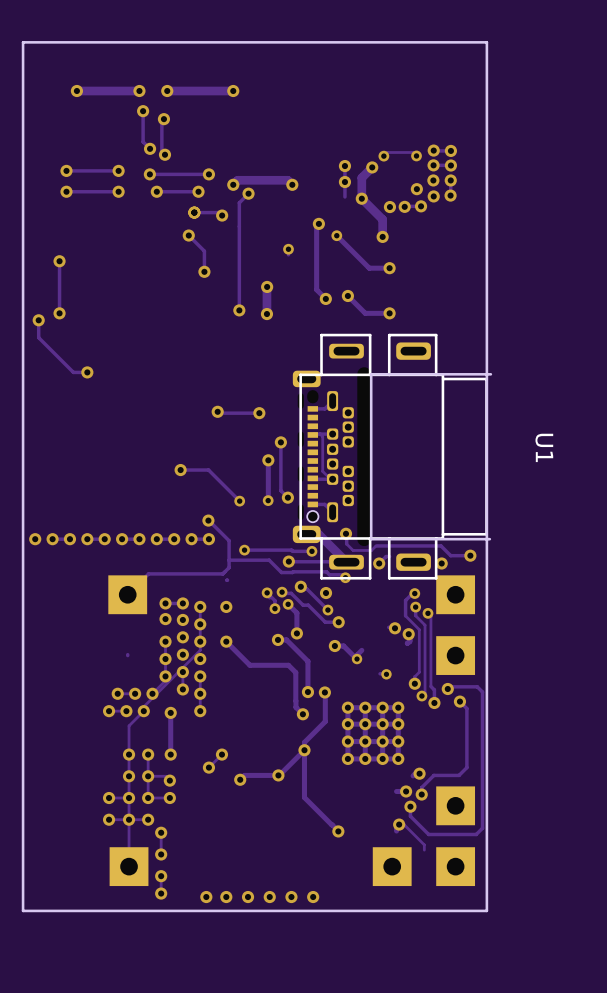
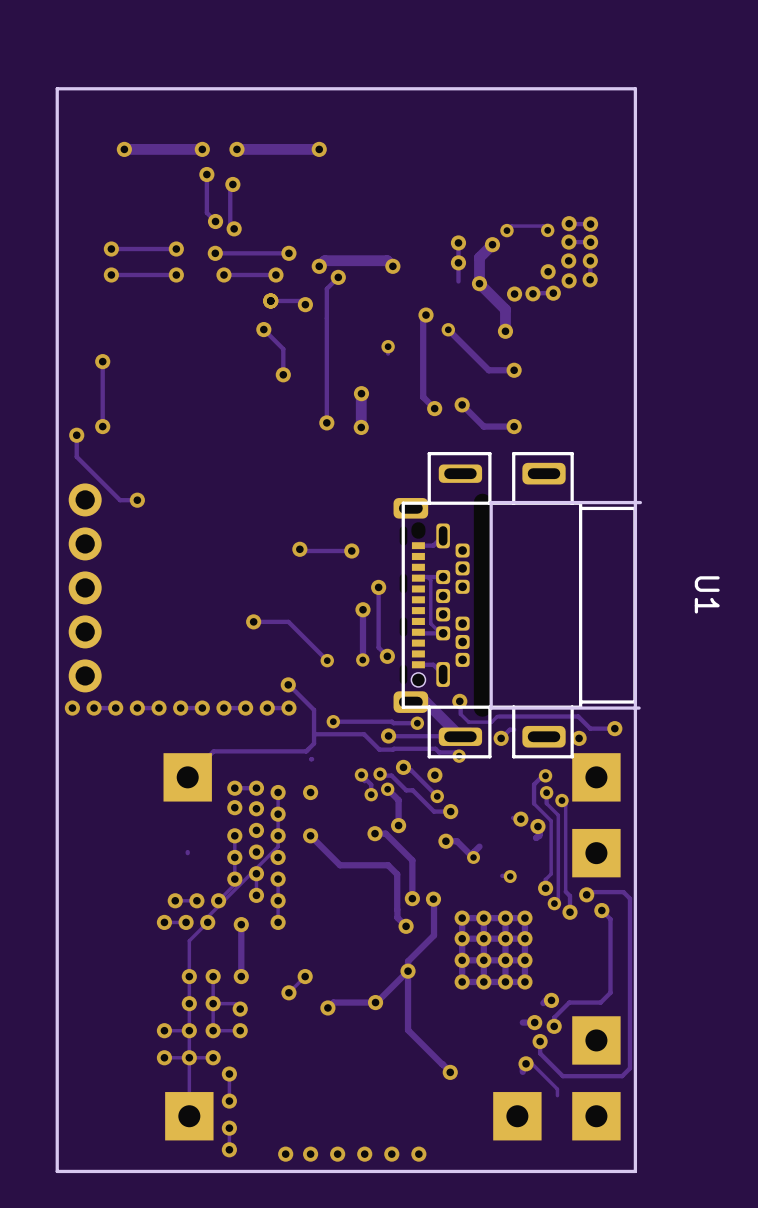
part: none -> (85, 587)

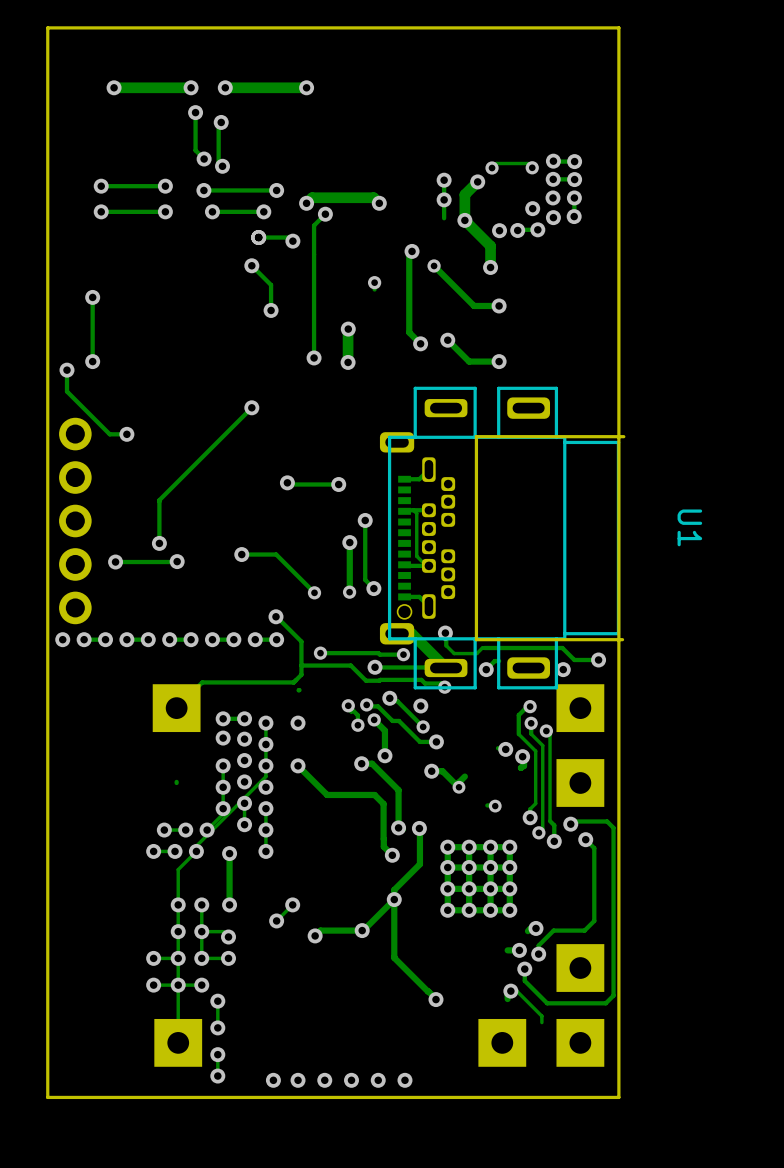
track: none -> (251, 407) (159, 500) (159, 543)
via: none -> (251, 407)
via: none -> (159, 543)
via: none -> (115, 562)
track: none -> (177, 561) (115, 562)
via: none -> (177, 561)

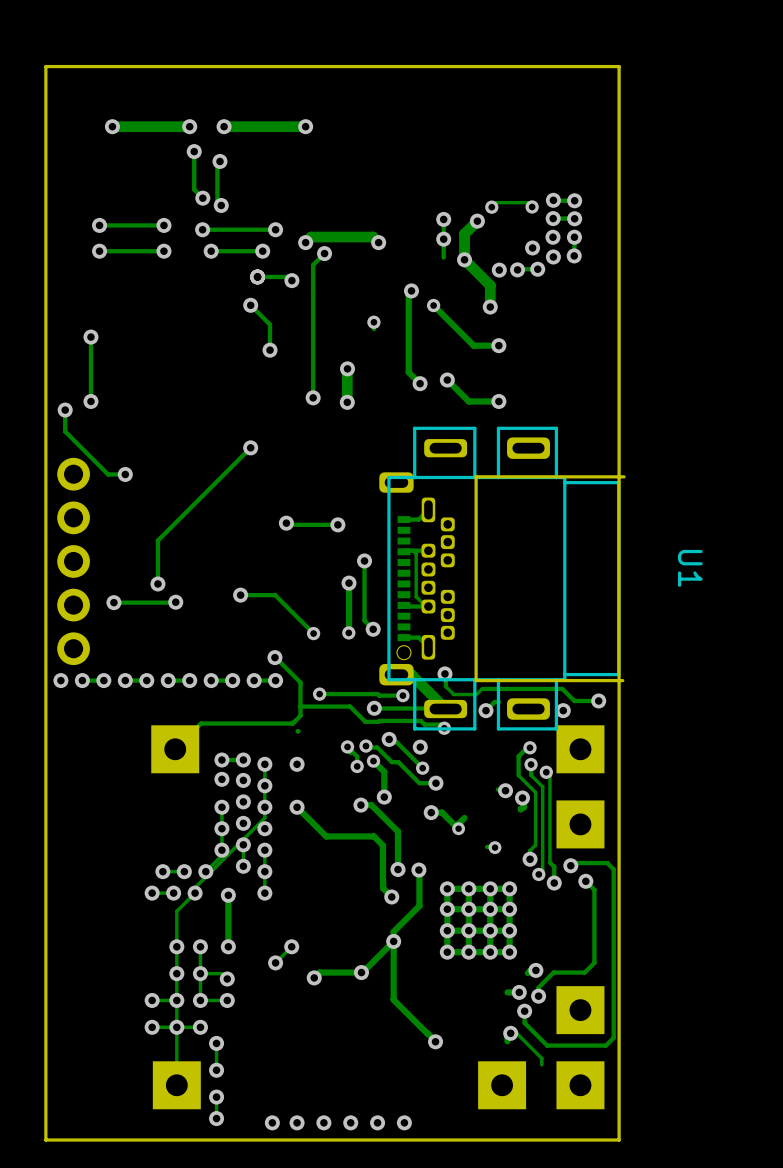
track: (176, 781) (176, 782) -> none

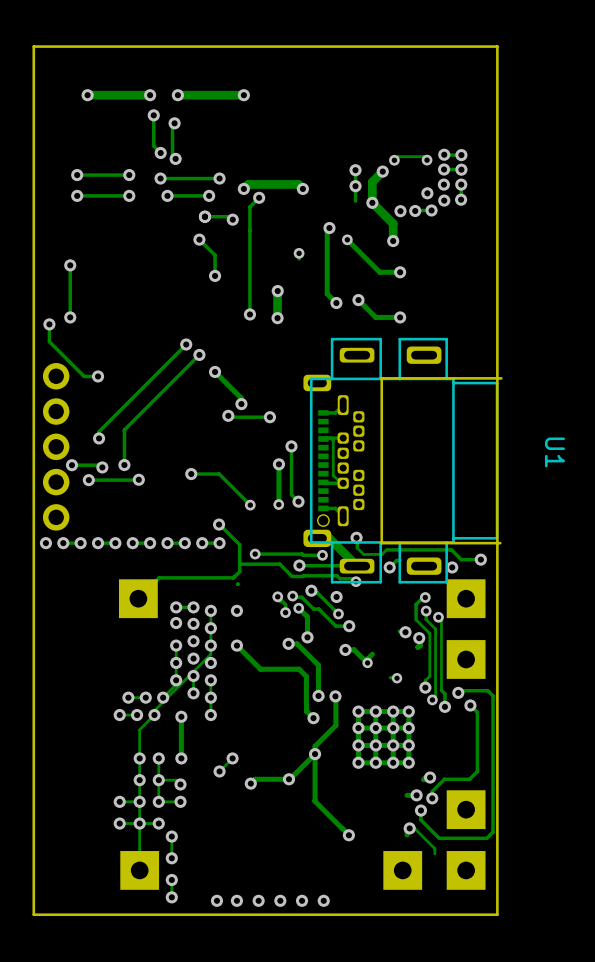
track: none -> (186, 344) (99, 431) (99, 438)
via: none -> (186, 344)
track: none -> (215, 371) (241, 398) (241, 404)
via: none -> (215, 371)
via: none -> (241, 404)
via: none -> (99, 438)
track: none -> (71, 465) (100, 465) (102, 467)
via: none -> (71, 465)
via: none -> (102, 467)

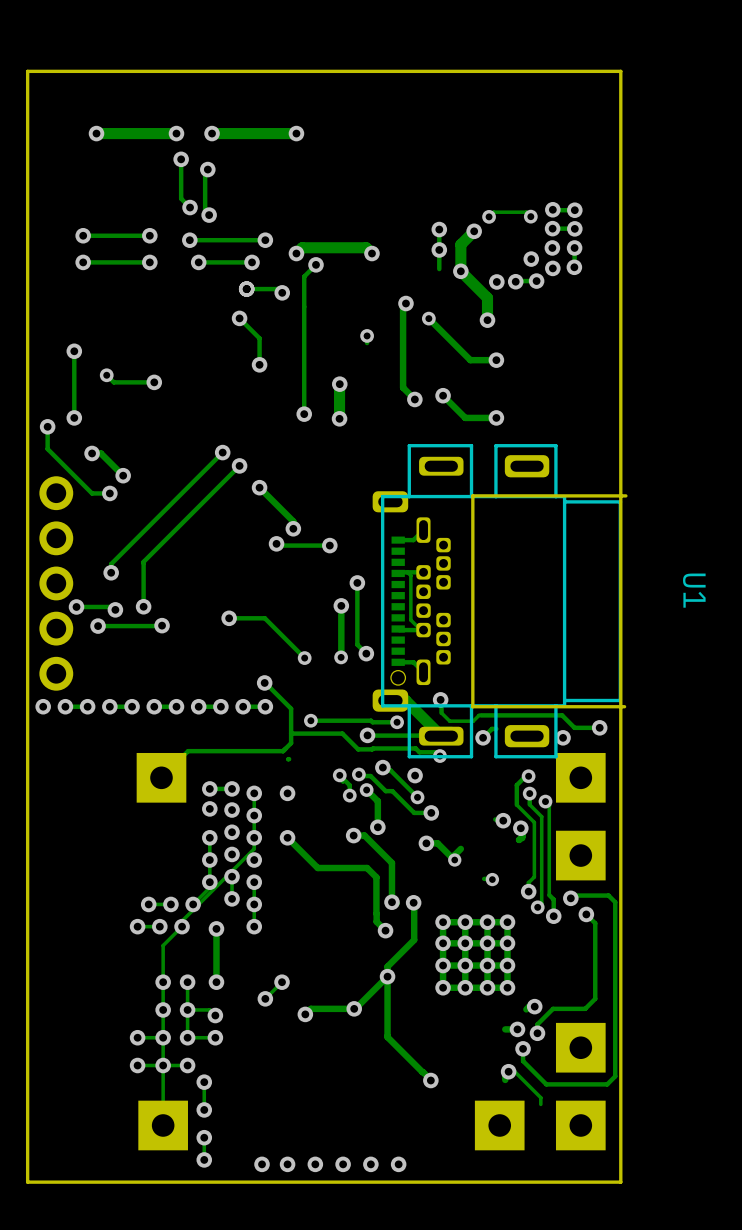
track: none -> (106, 375) (113, 382) (154, 382)
via: none -> (106, 375)
via: none -> (154, 382)
track: none -> (92, 453) (100, 453) (123, 475)
via: none -> (92, 453)
via: none -> (123, 475)

